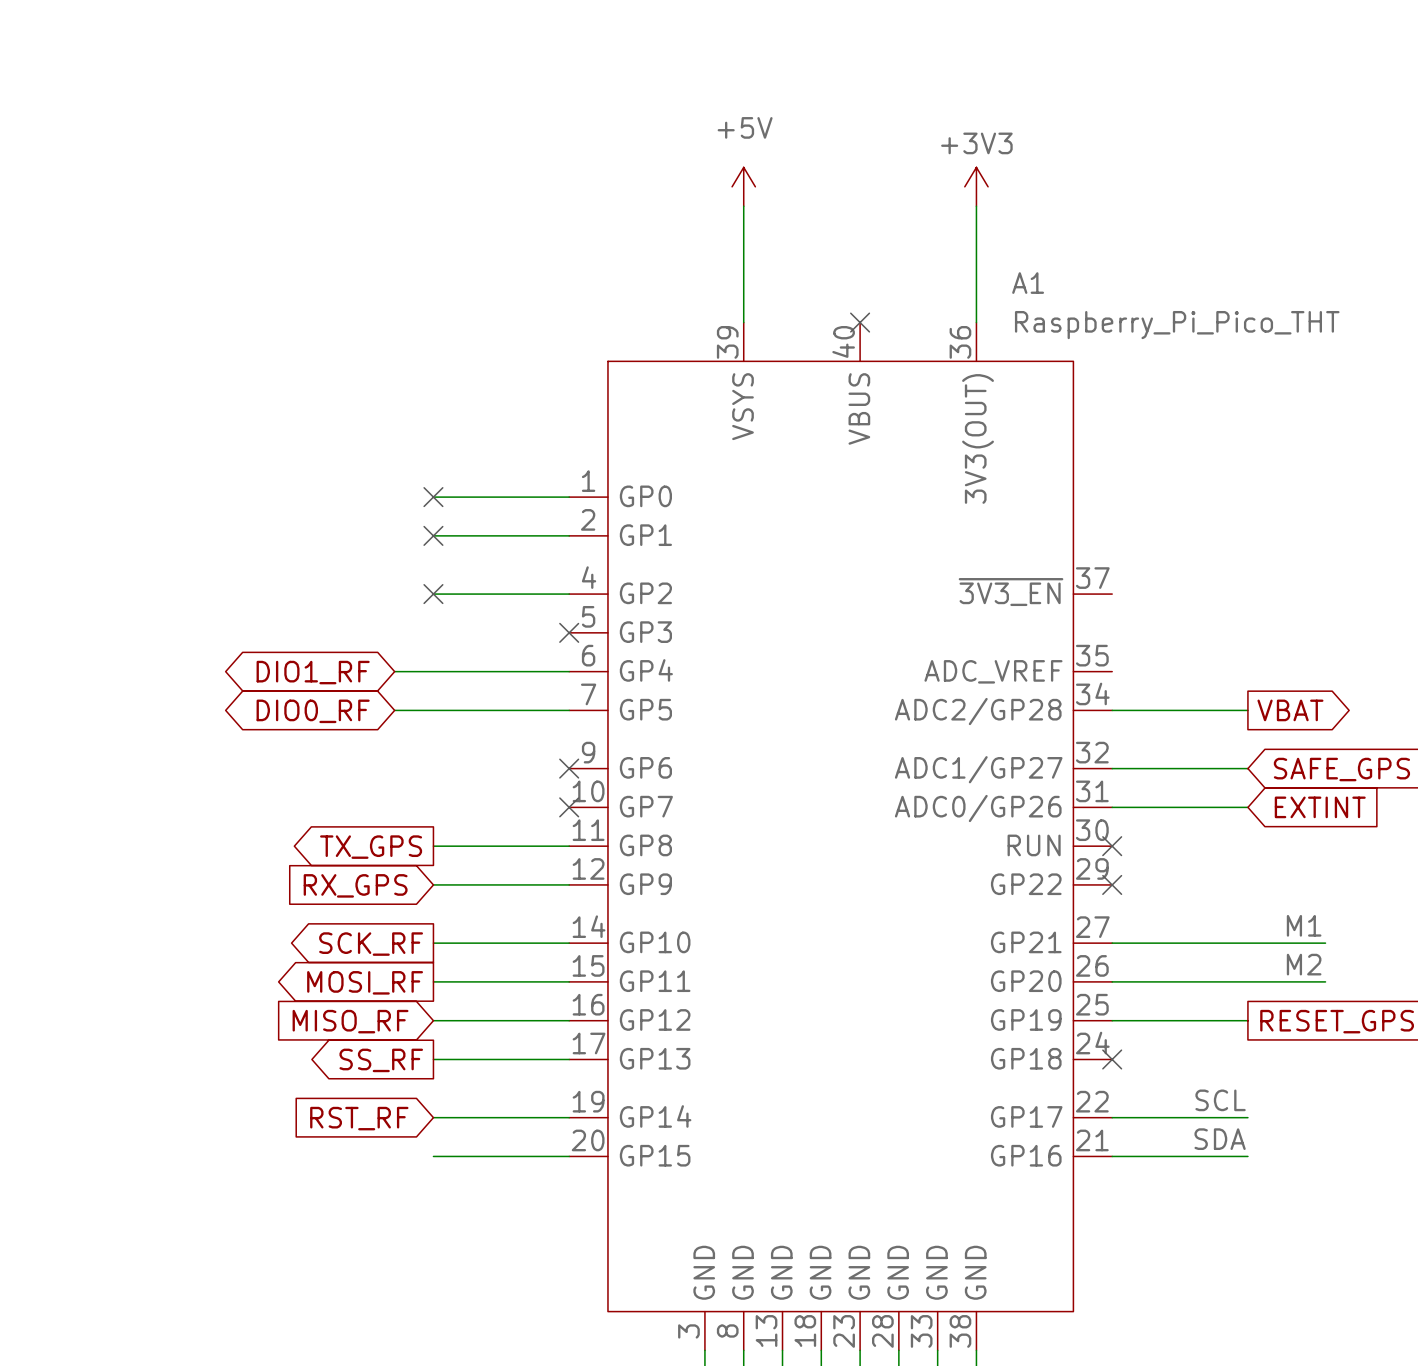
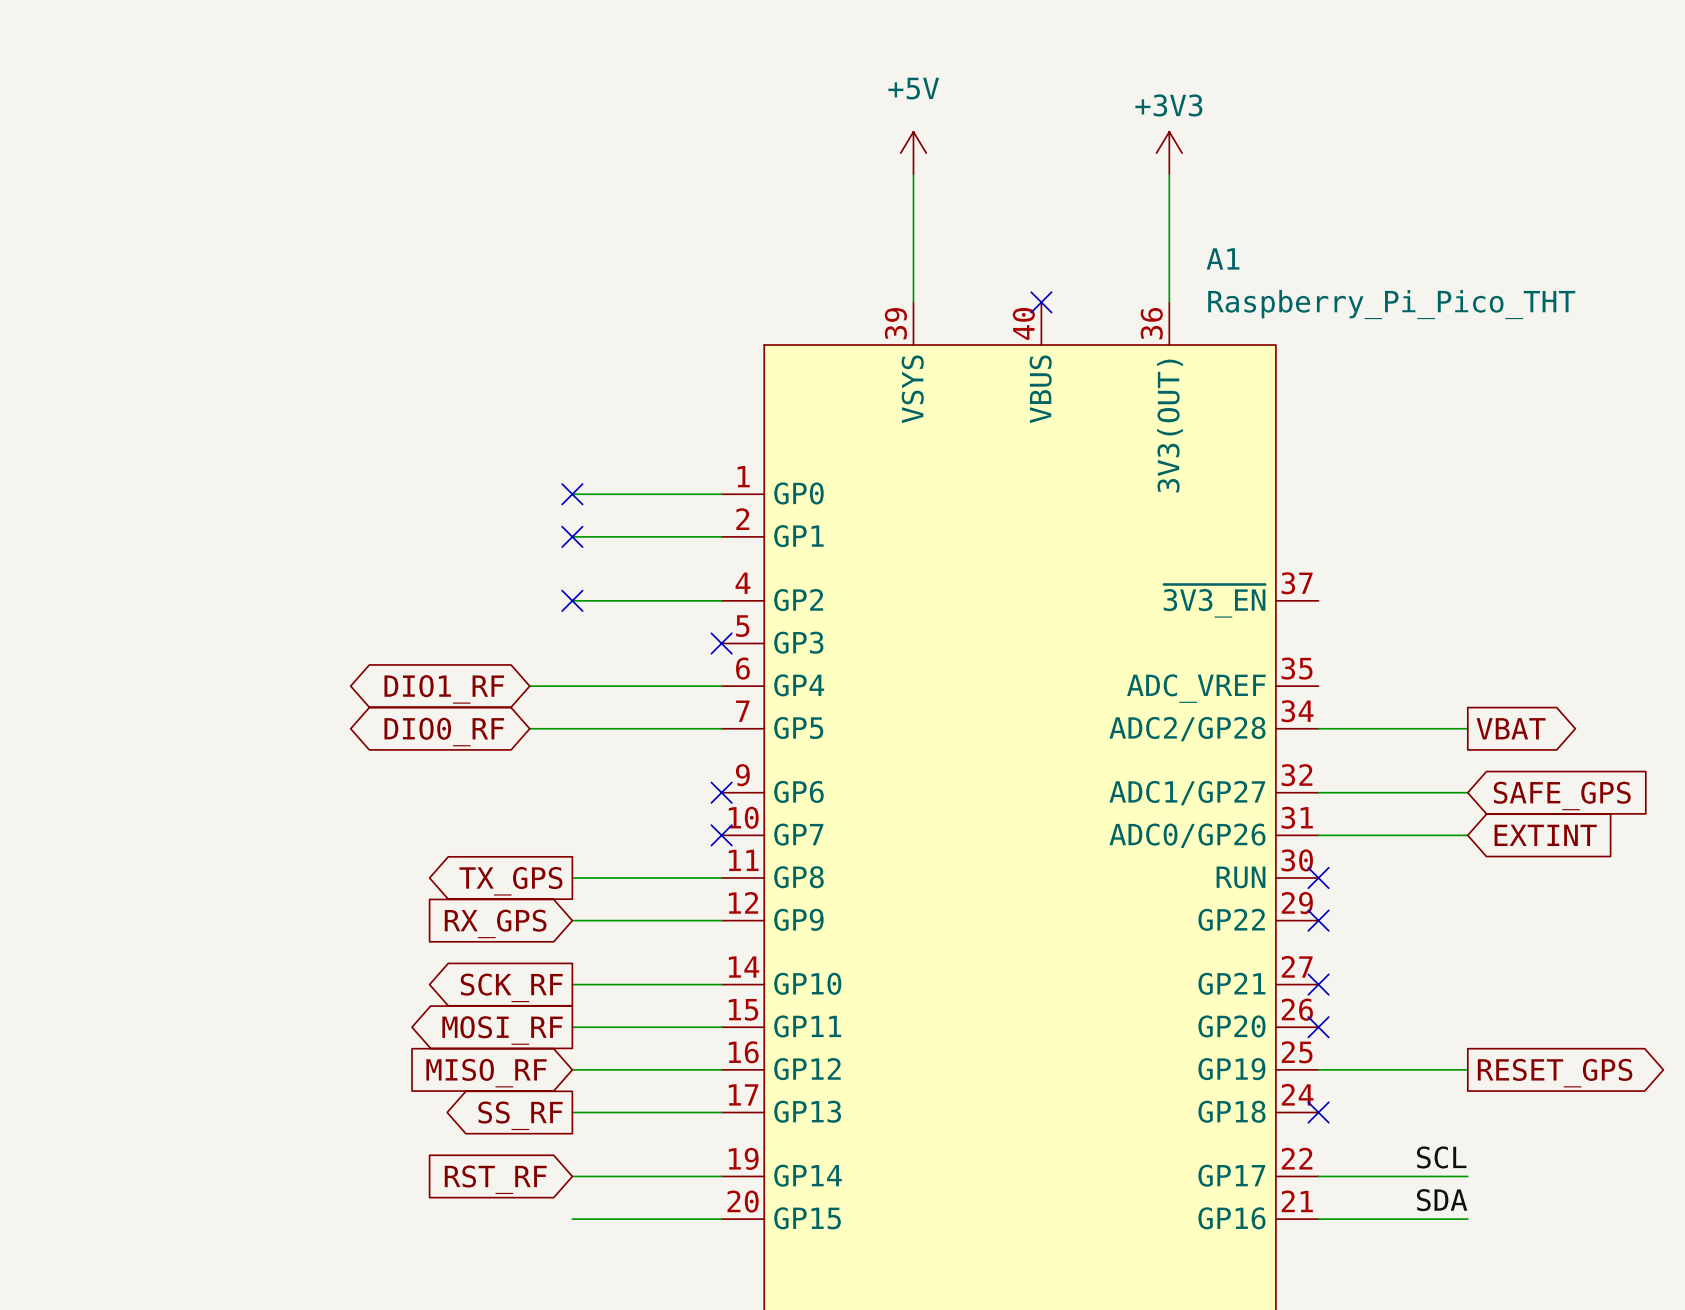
label: M1 (1304, 925) -> none
wire: (1112, 943) (1325, 943) -> none
no-connect mark: none -> (1318, 984)
label: M2 (1304, 964) -> none
wire: (1112, 981) (1325, 981) -> none
no-connect mark: none -> (1318, 1027)

